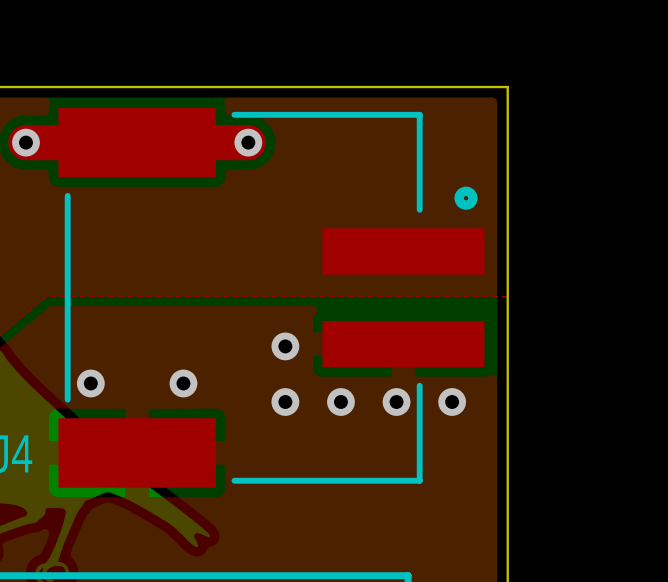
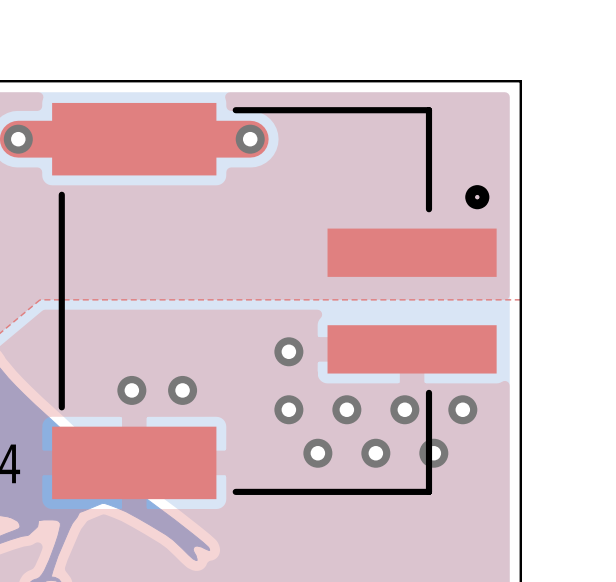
via position: (90, 383) -> (131, 390)
via: none -> (317, 453)
via: none -> (375, 453)
via: none -> (433, 453)

